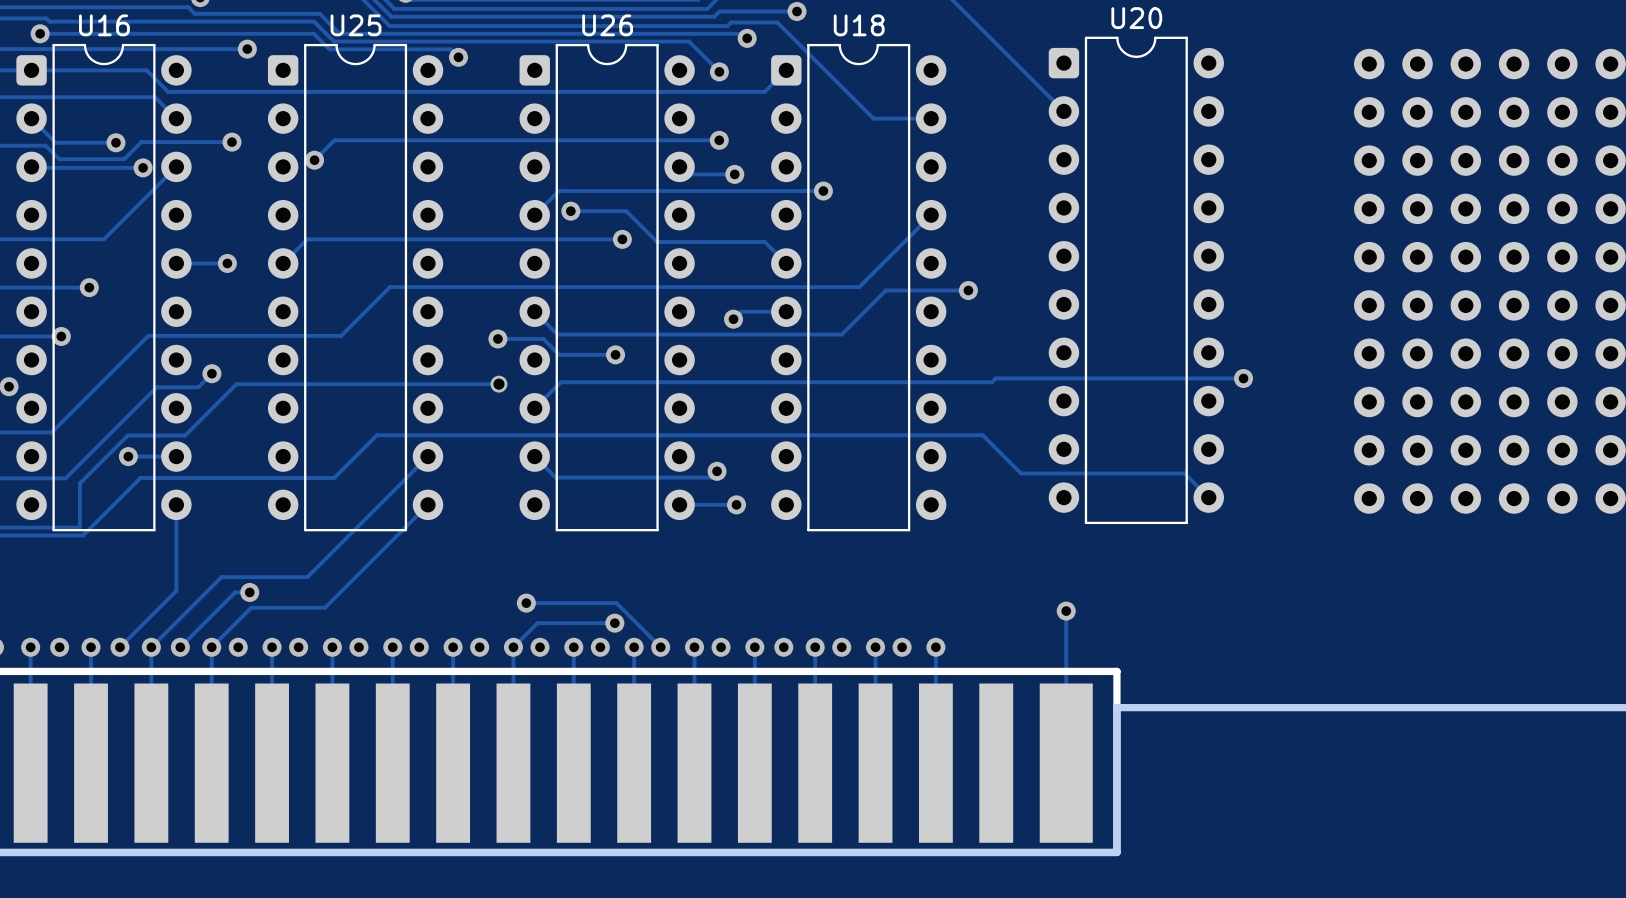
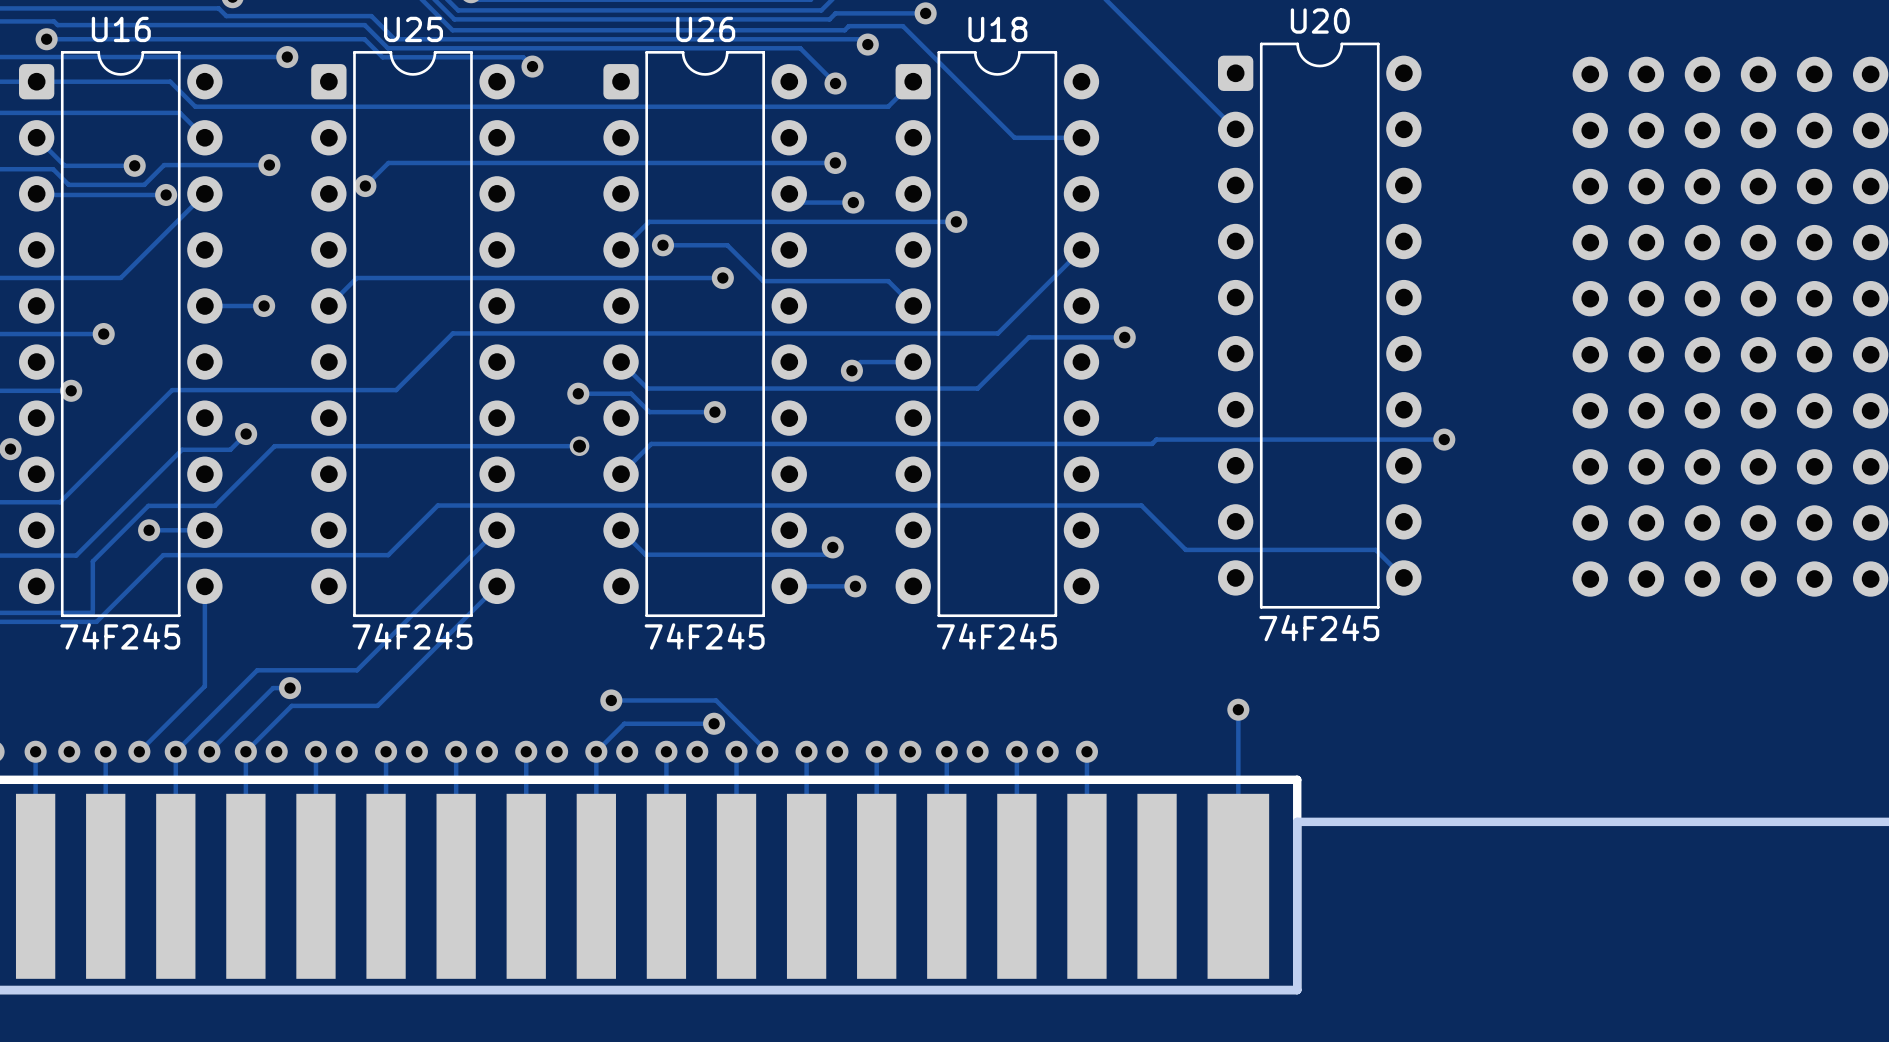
U20 value: none -> 74F245 (1319, 628)
U16 value: none -> 74F245 (120, 636)
U25 value: none -> 74F245 (412, 636)
U26 value: none -> 74F245 (704, 636)
U18 value: none -> 74F245 (996, 636)

